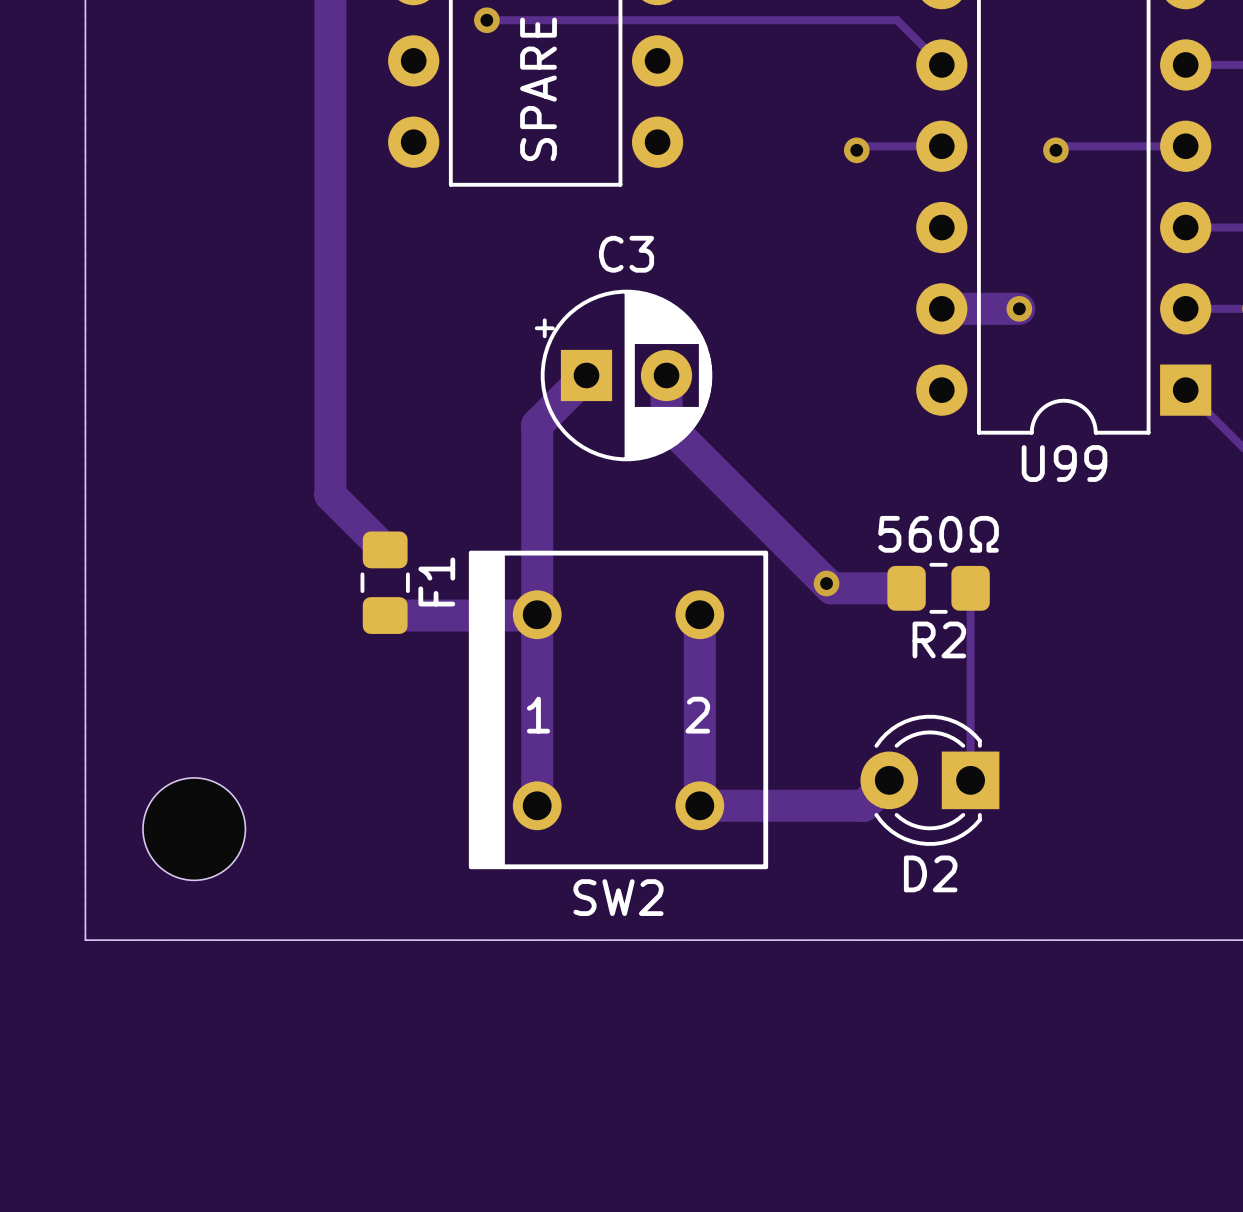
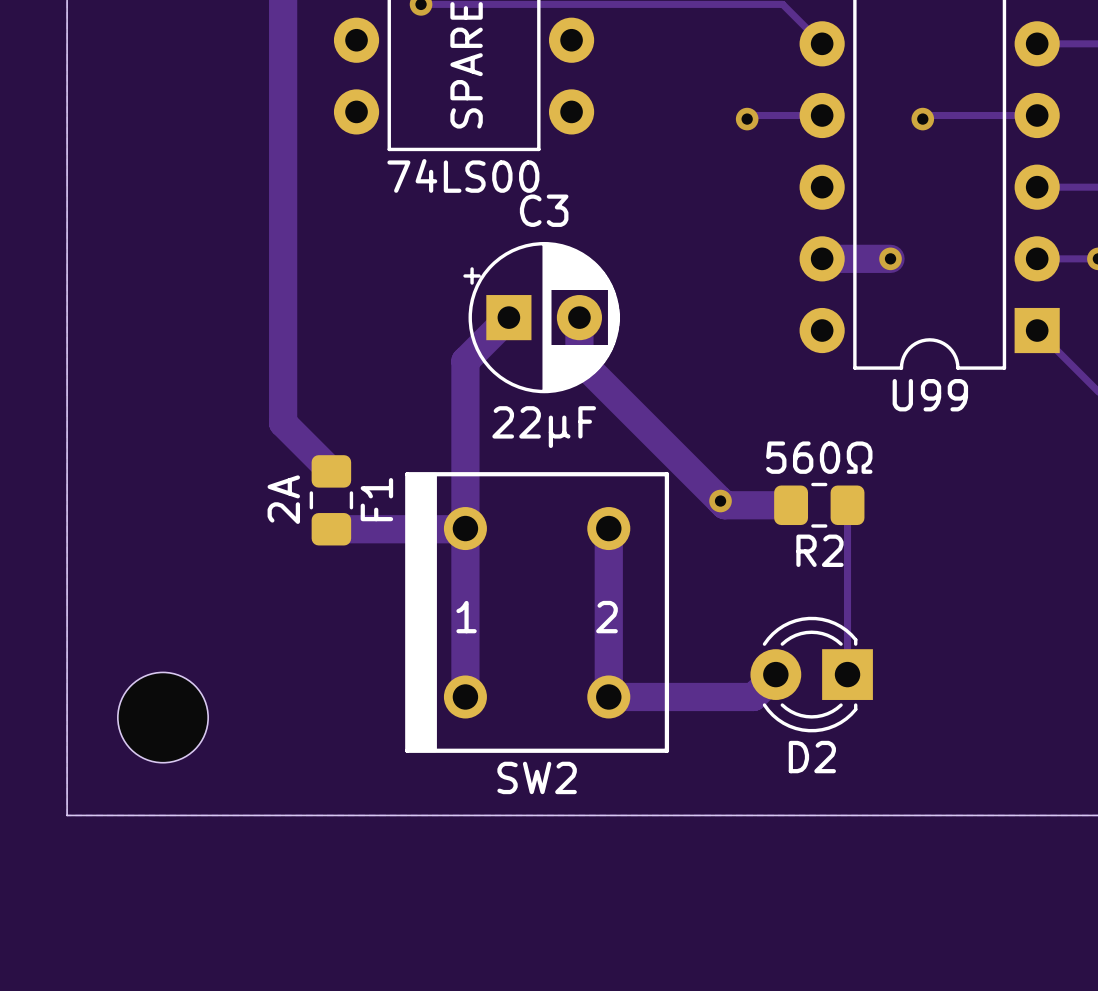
part value: none -> 74LS00 (463, 175)
C3 value: none -> 22µF (544, 427)
F1 value: none -> 2A (283, 499)

